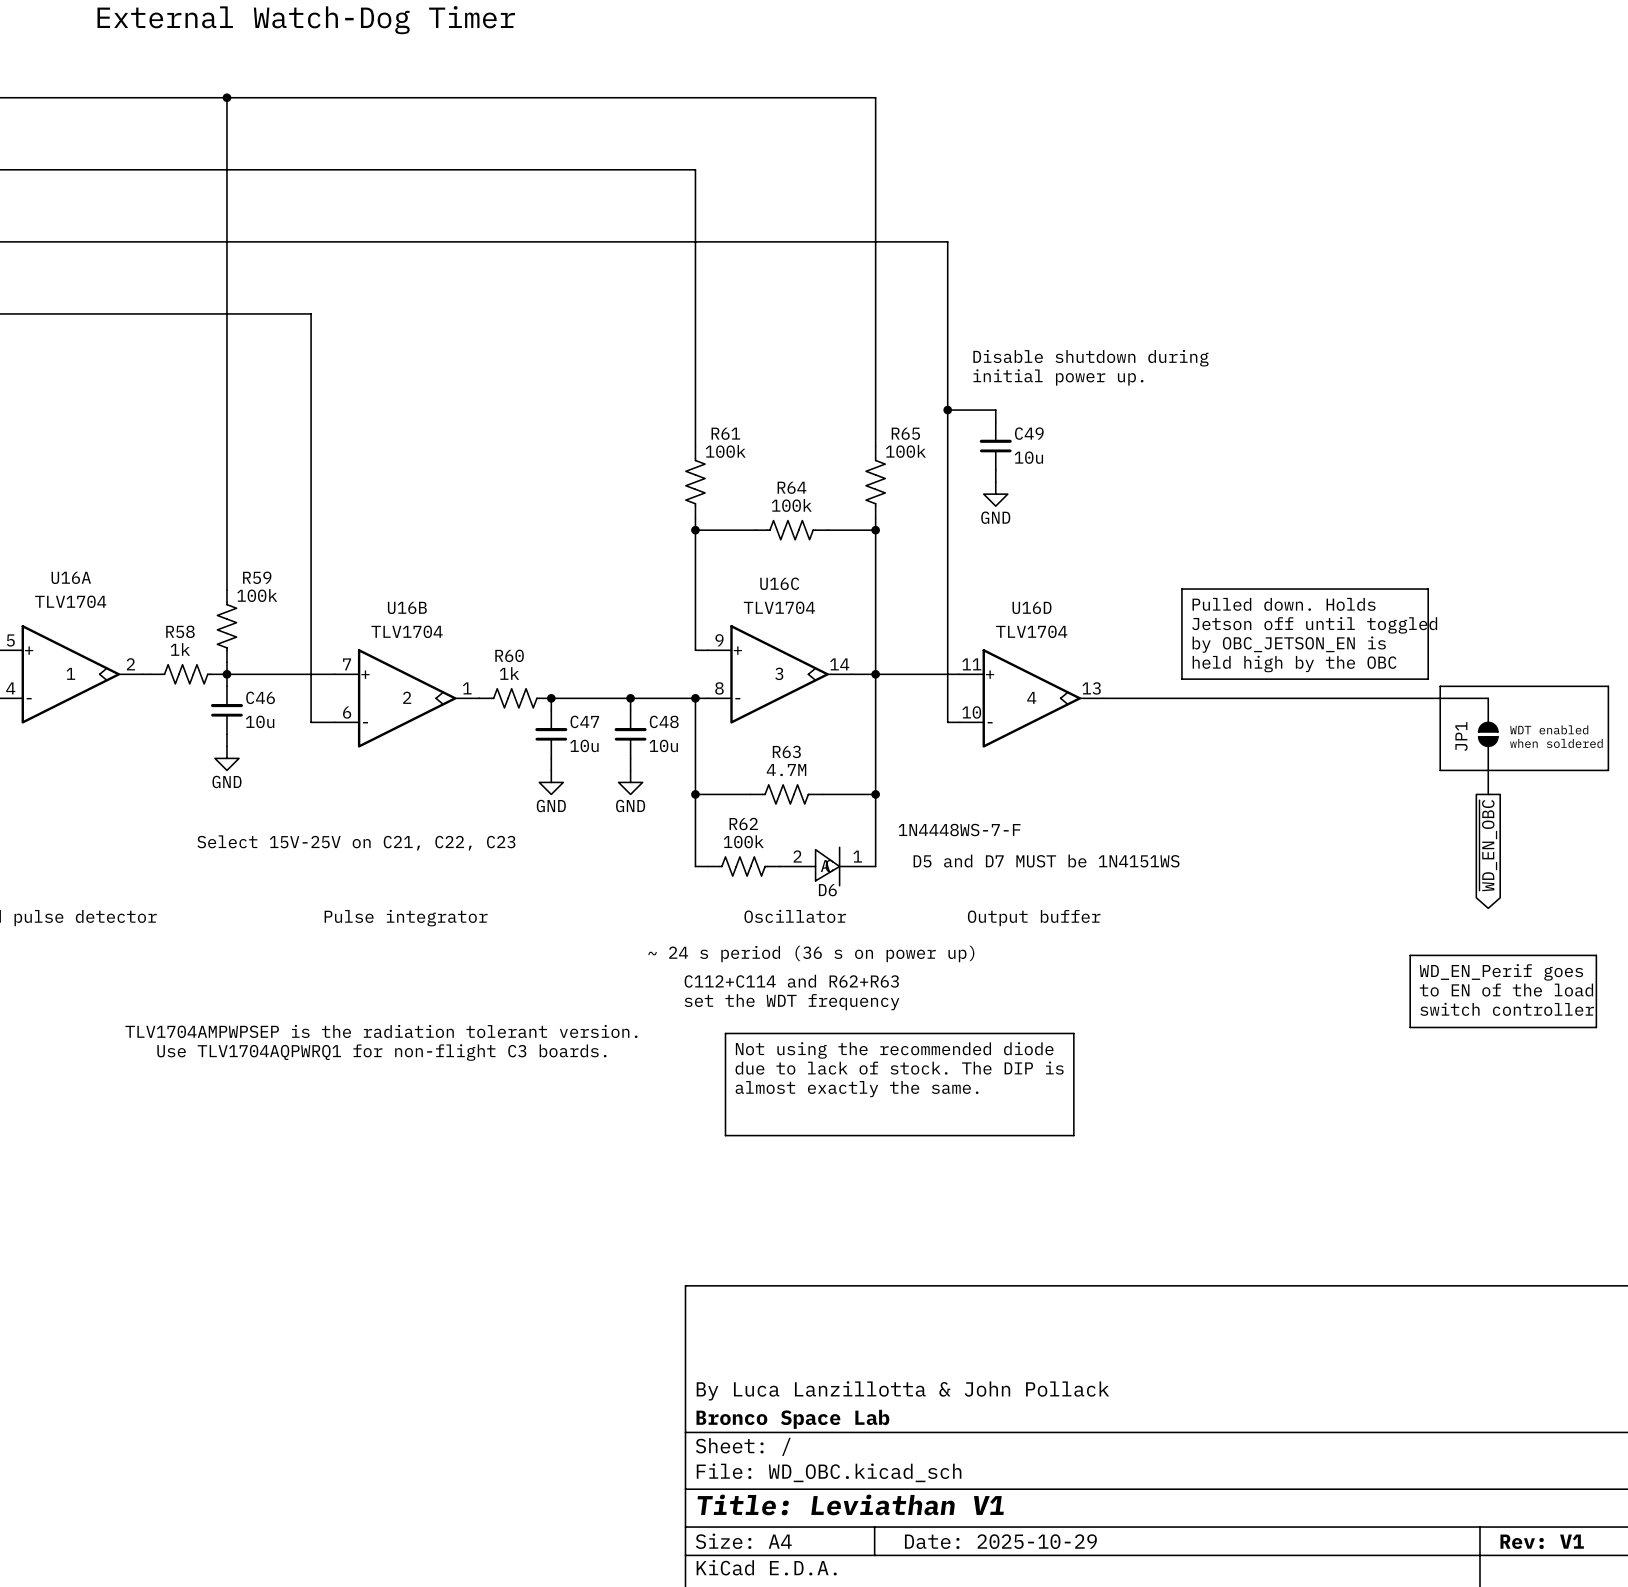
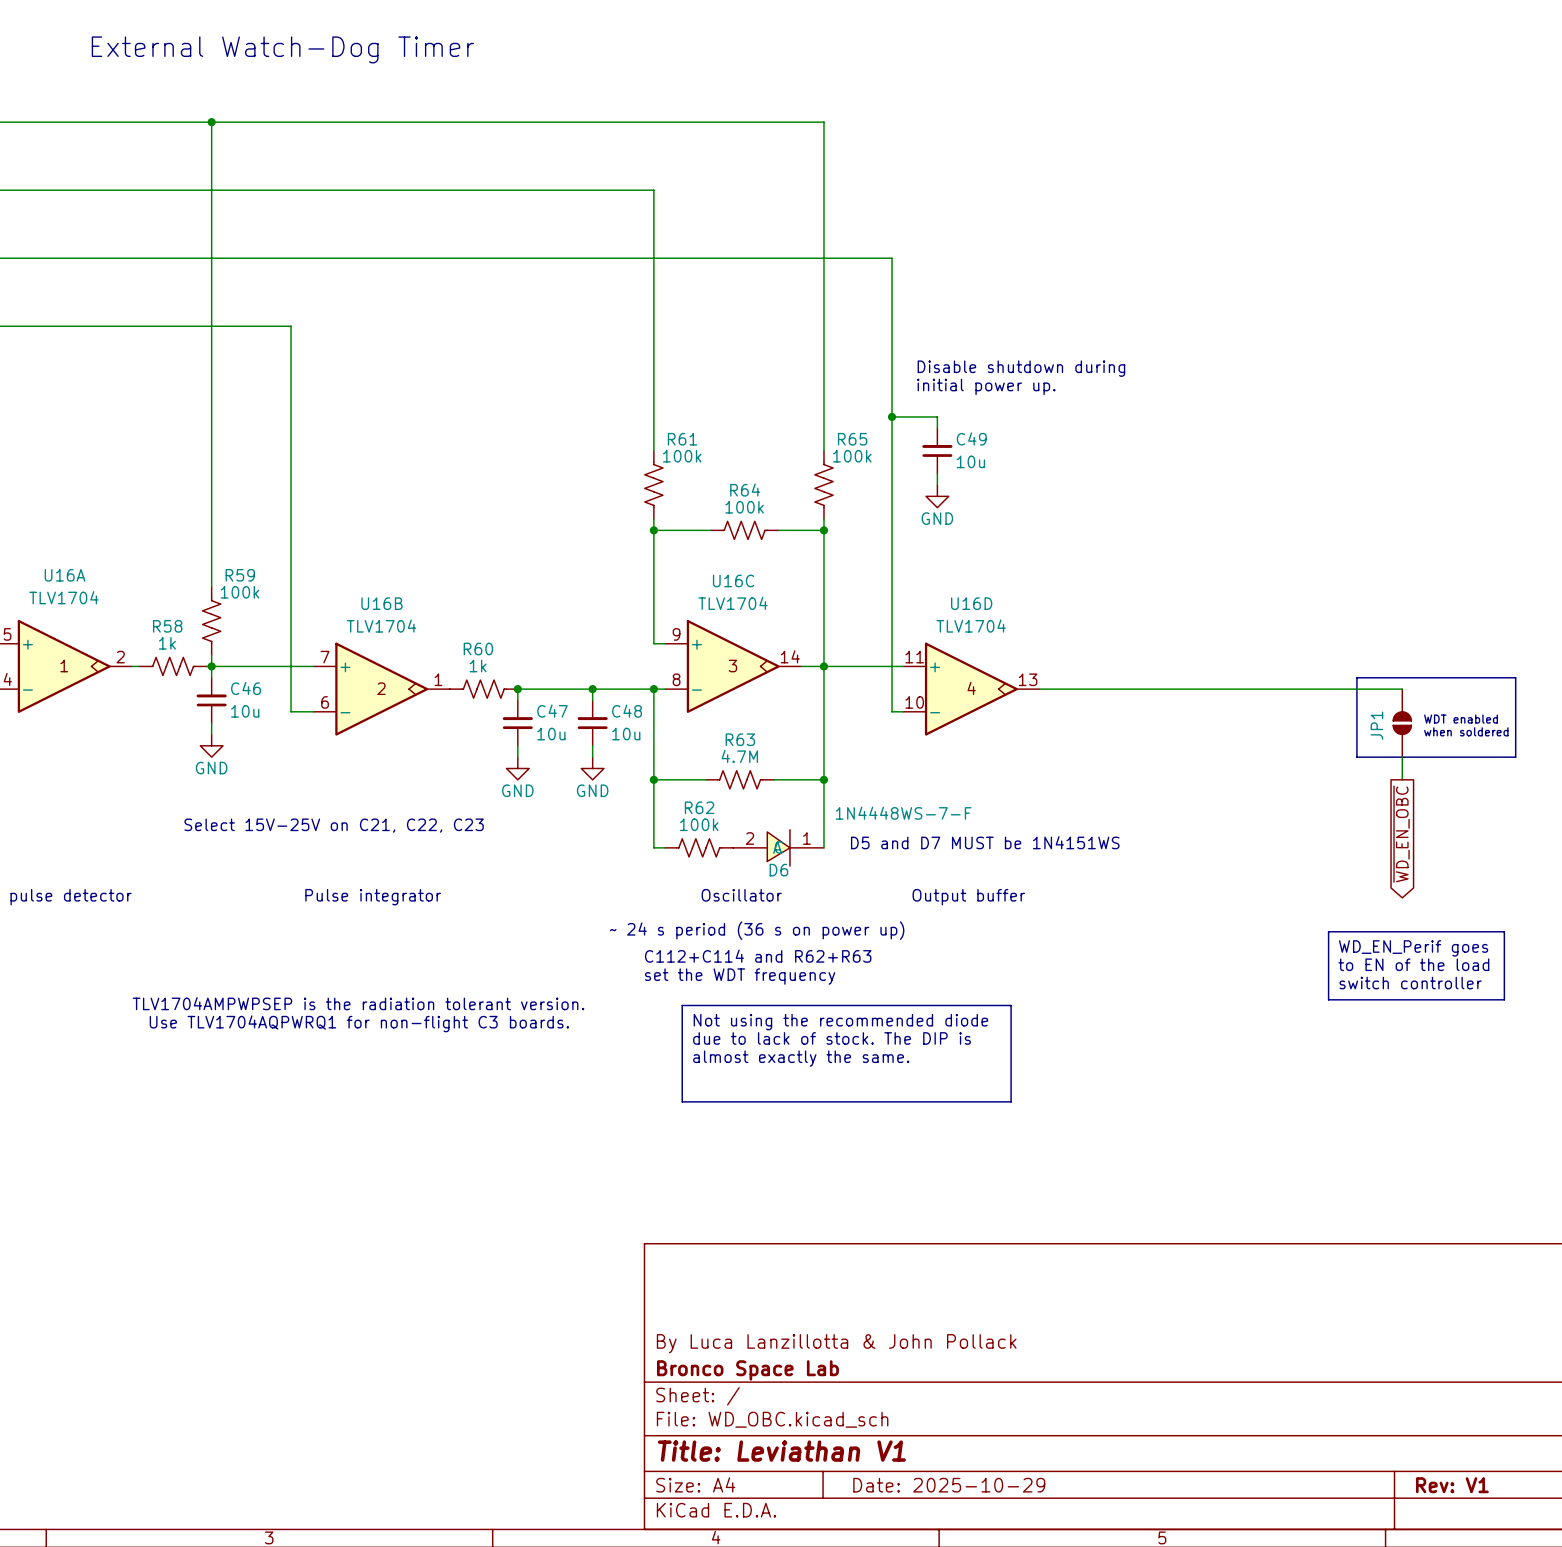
line: (1181, 589) (1428, 589) (1428, 679) (1181, 679) (1181, 589) -> none
text: Pulled down. Holds (1284, 604) -> none
text: Jetson off until toggled (1314, 625) -> none
text: by OBC_JETSON_EN is (1289, 644) -> none
text: held high by the OBC (1294, 664) -> none

